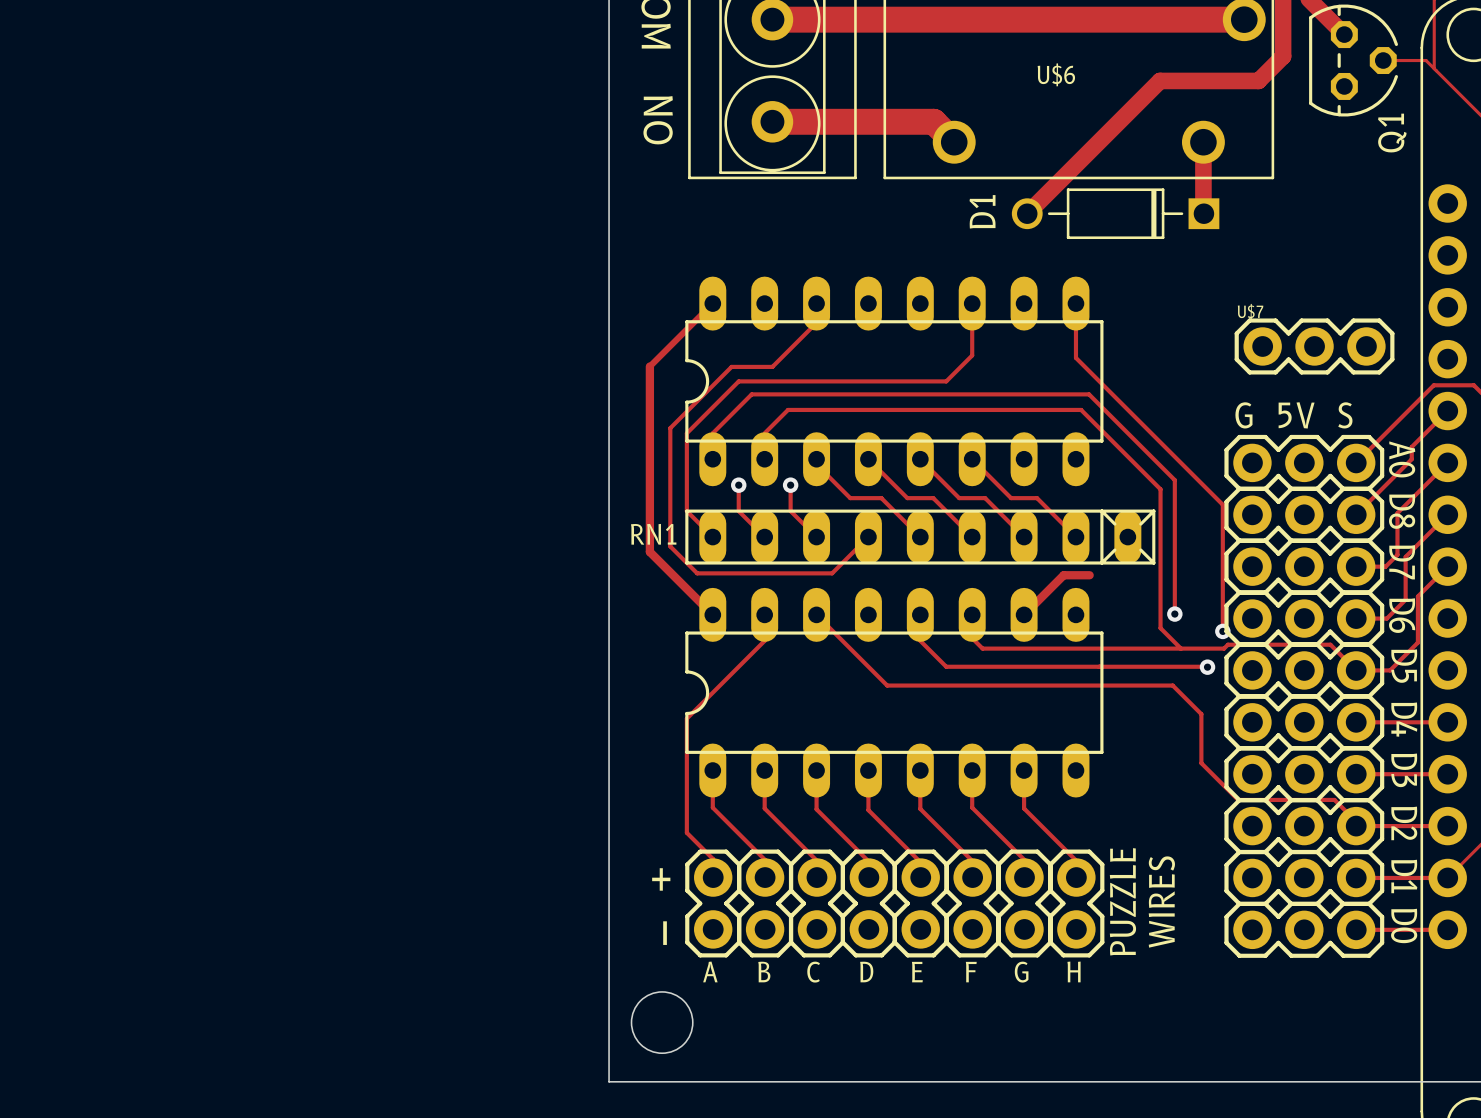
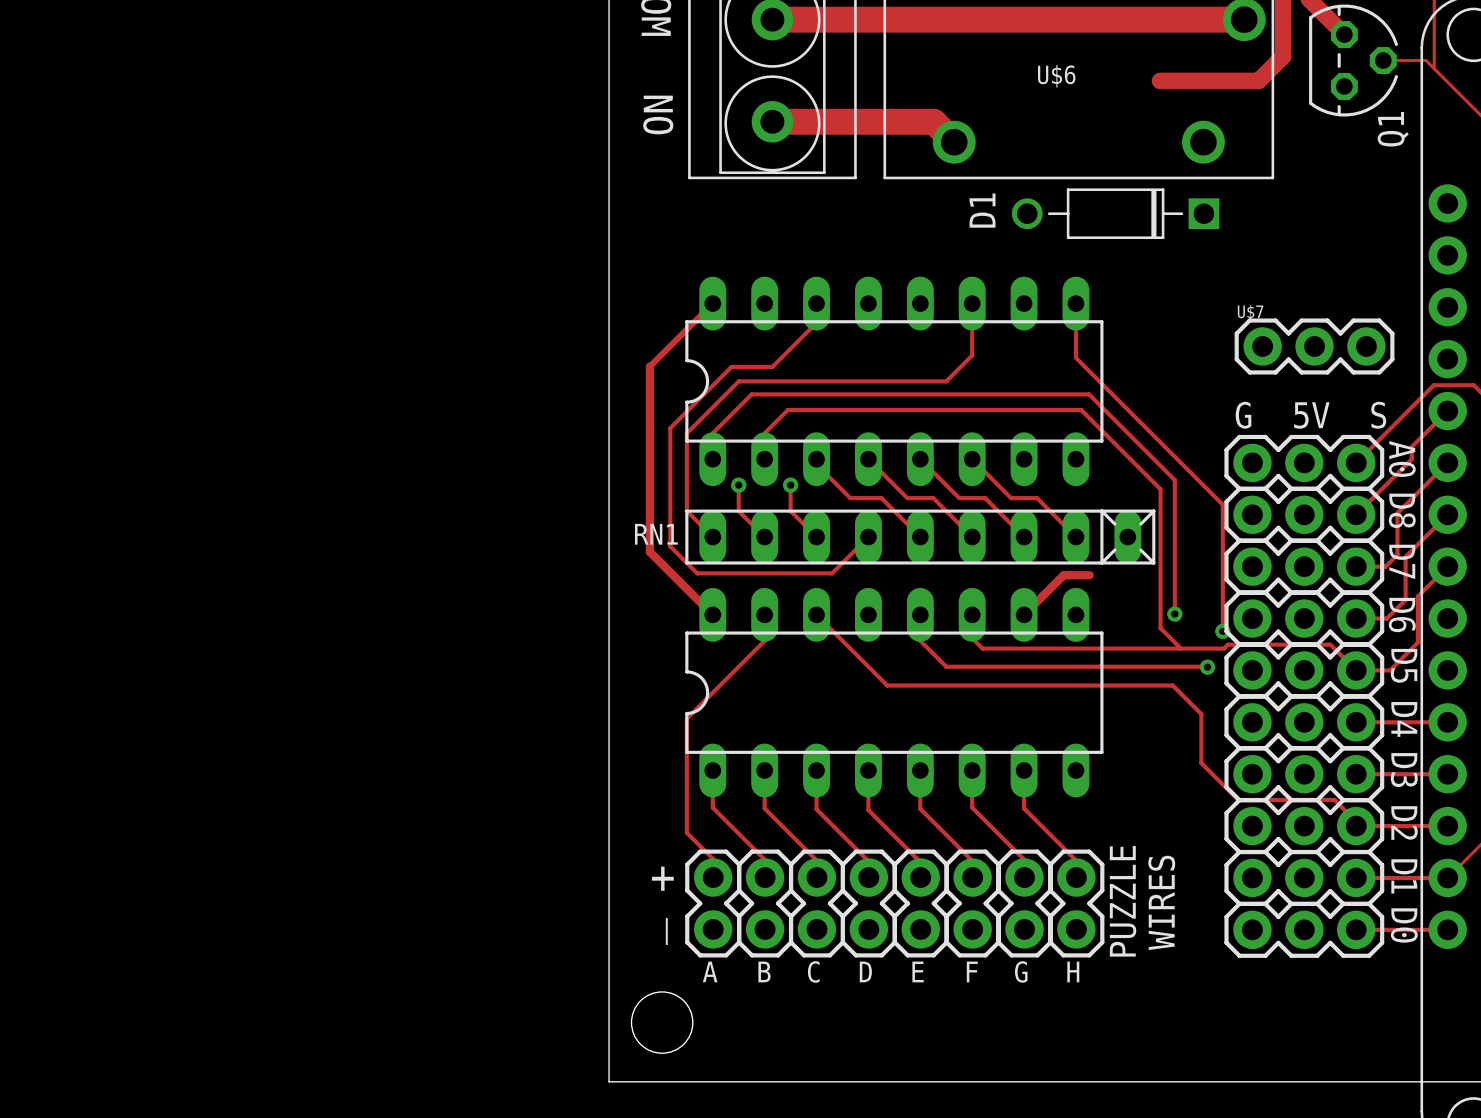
track: (1160, 80) (1027, 213) -> none
track: (1203, 142) (1203, 213) -> none

